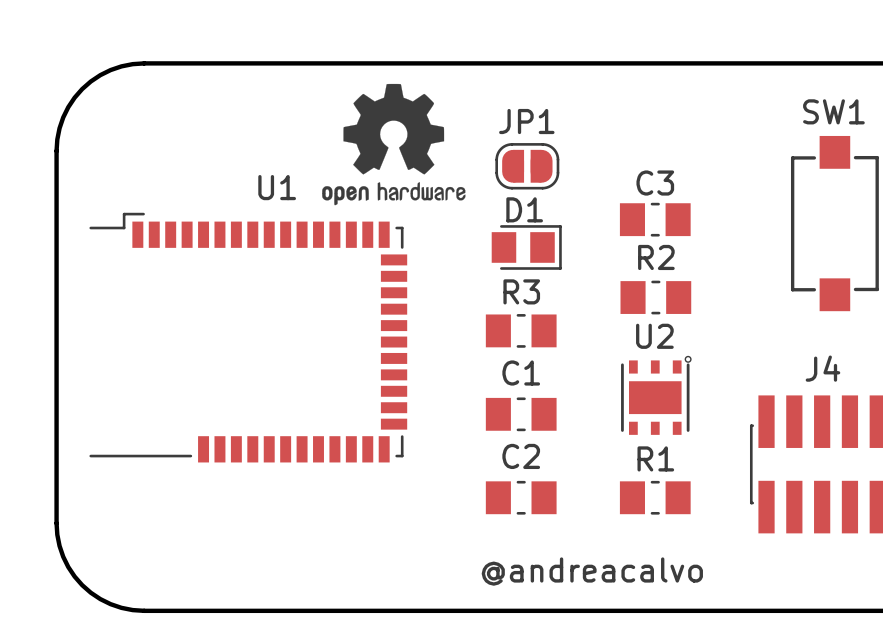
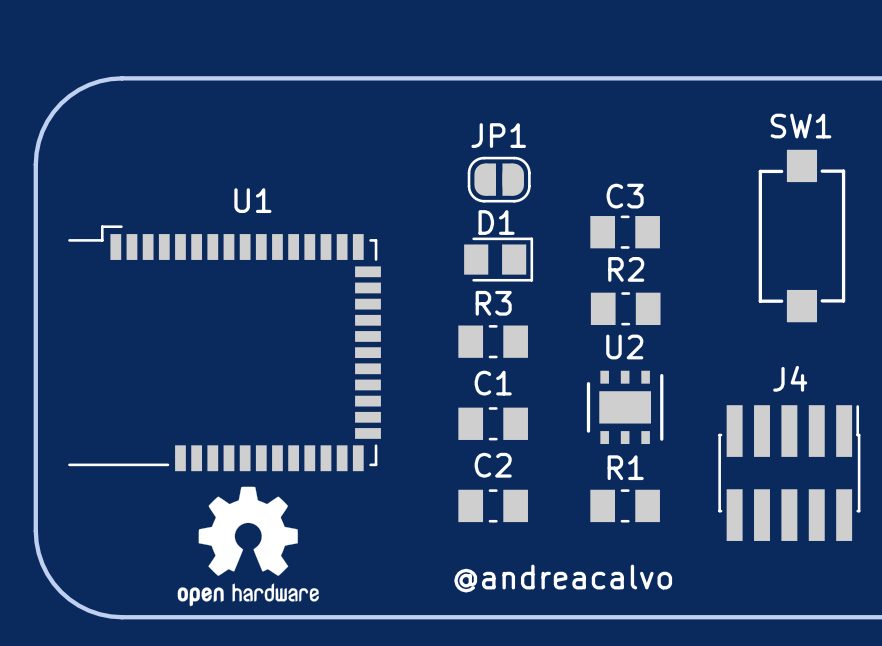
drawing position: (393, 144) -> (248, 546)
U2 footprint: [621, 356, 691, 435] -> [586, 370, 664, 445]

